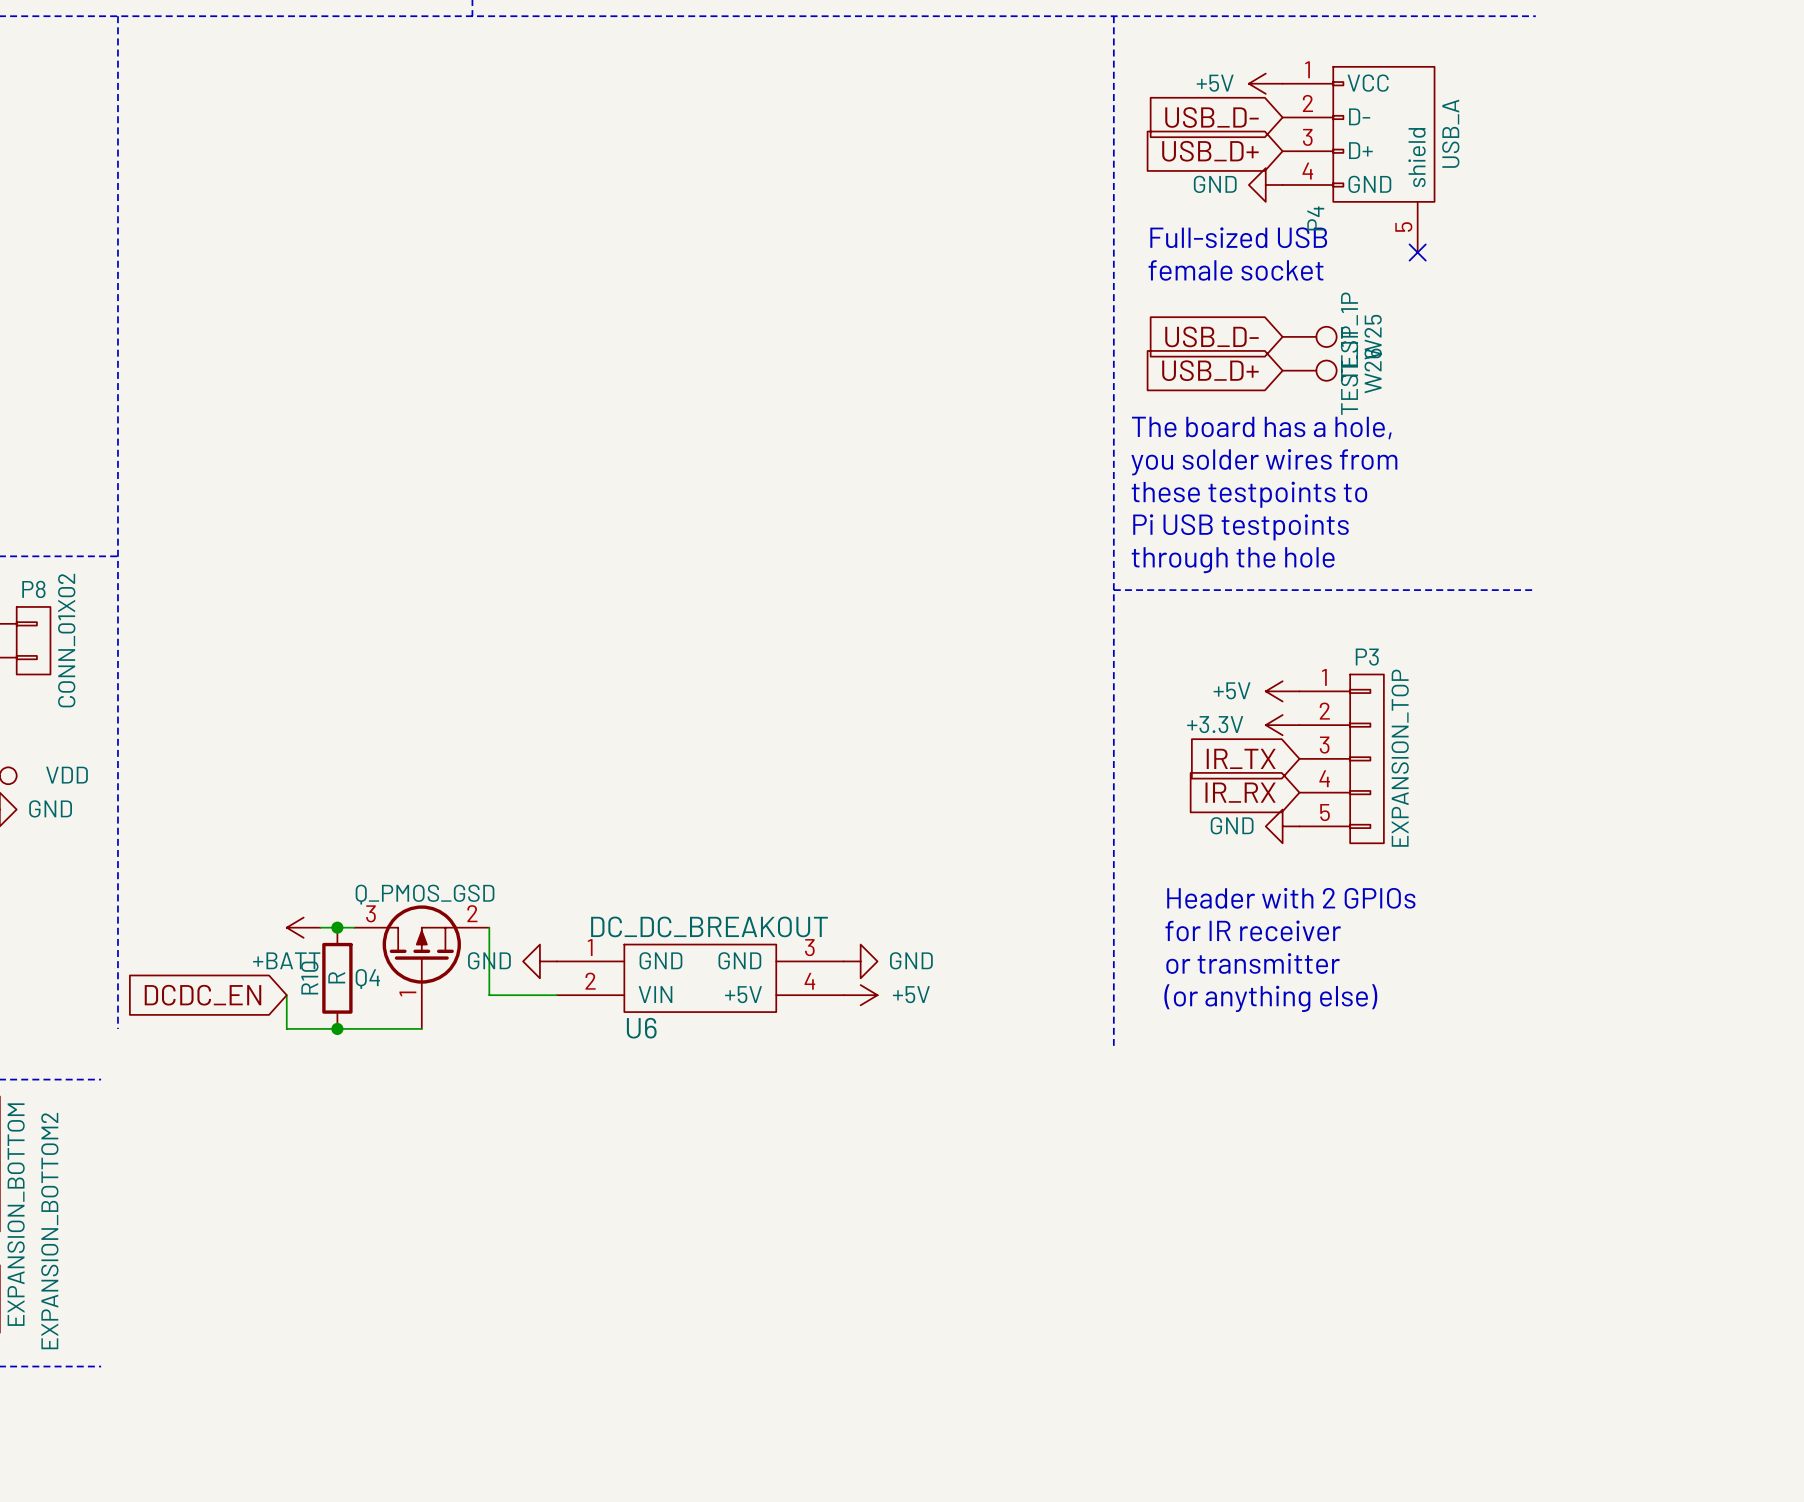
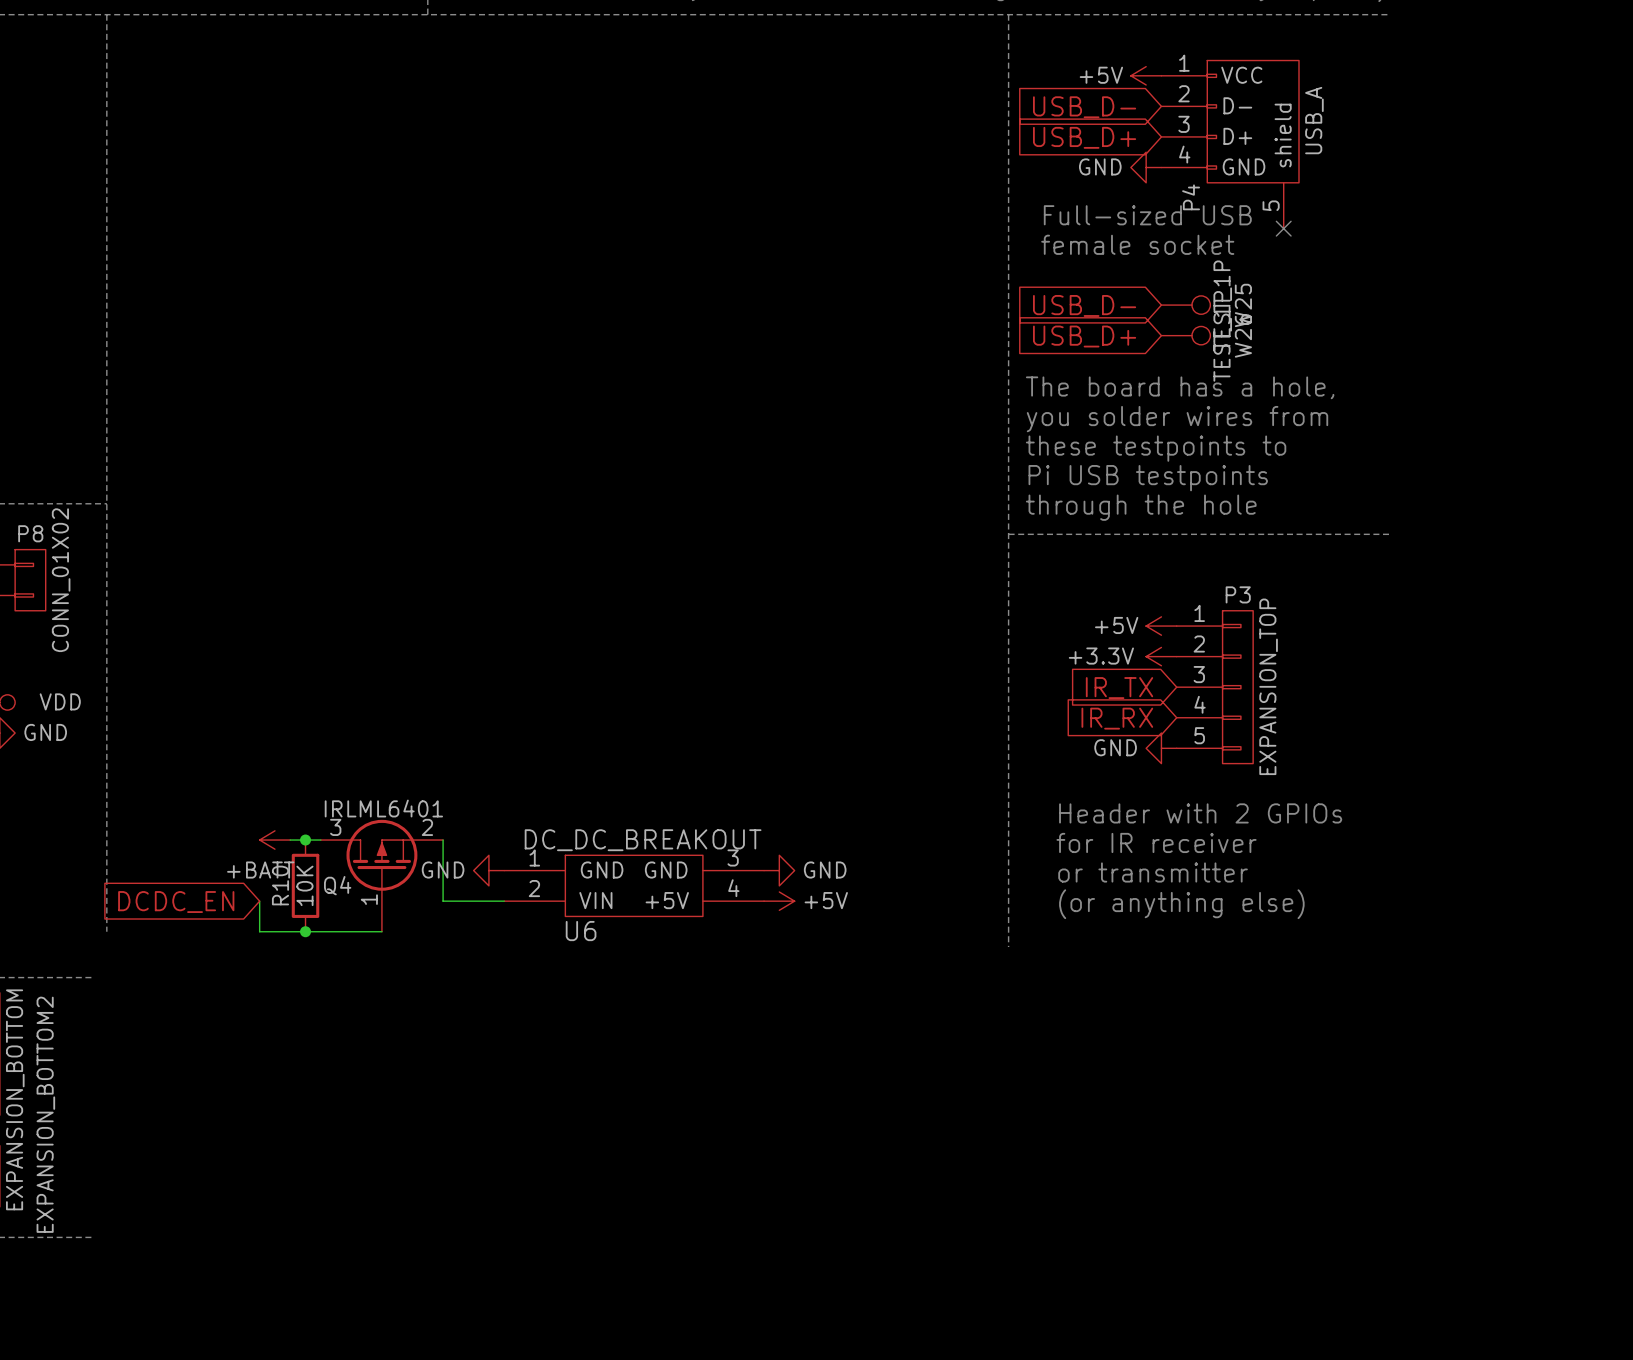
Q4 value: Q_PMOS_GSD (425, 894) -> IRLML6401 (383, 808)
R10 value: R (336, 977) -> 10K (304, 885)

